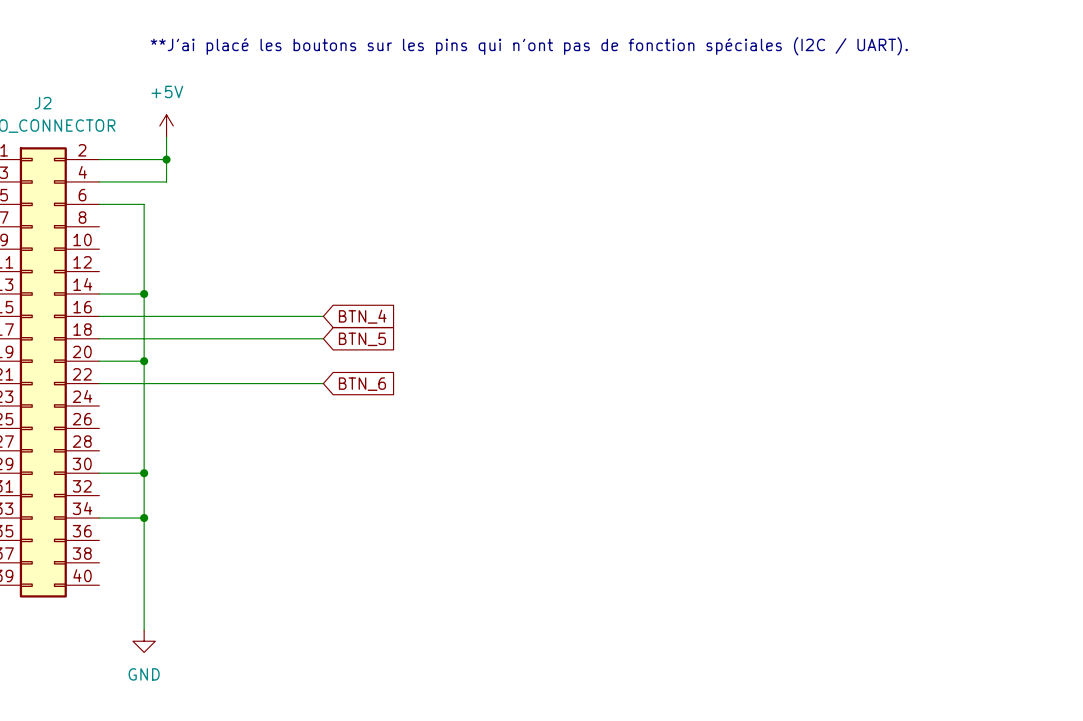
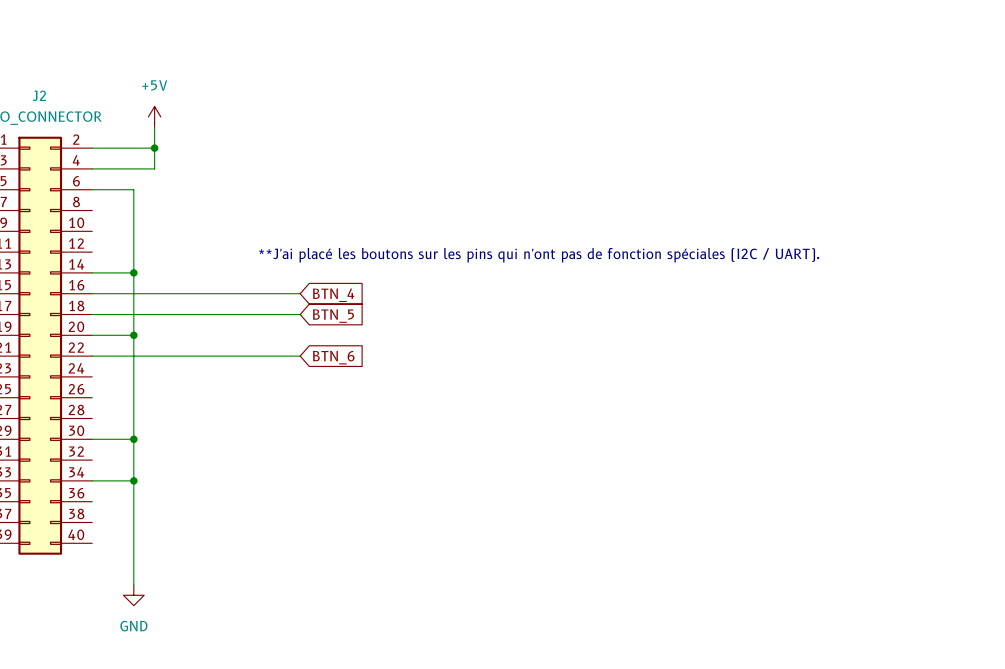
text: **J'ai placé les boutons sur les pins qui n'ont pas de fonction spéciales (I2C / UART). (529, 46) -> none
text: none -> **J'ai placé les boutons sur les pins qui n'ont pas de fonction spéciales (I2C / UART). (539, 255)

